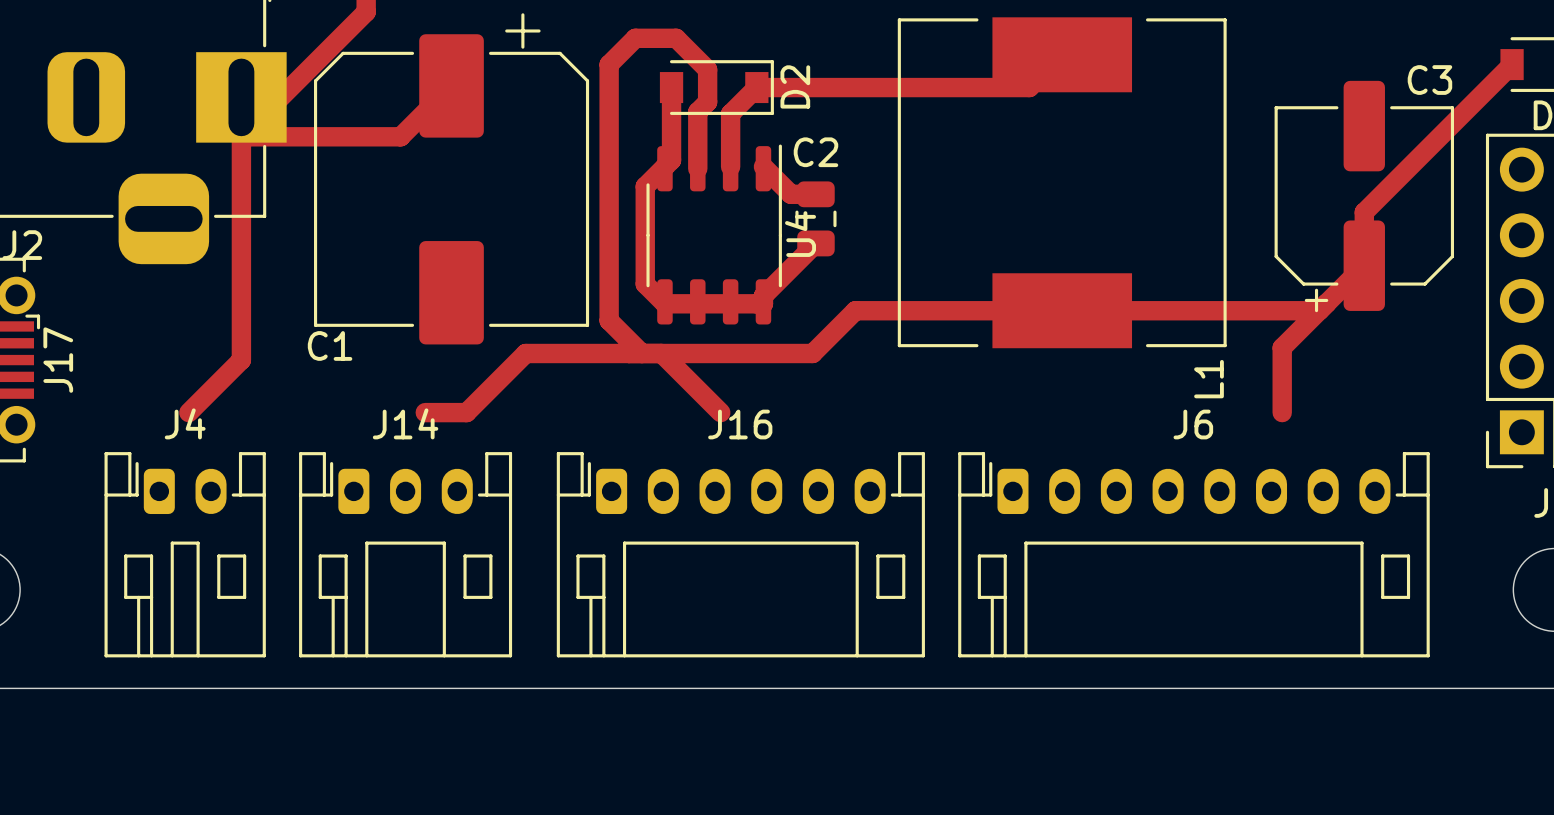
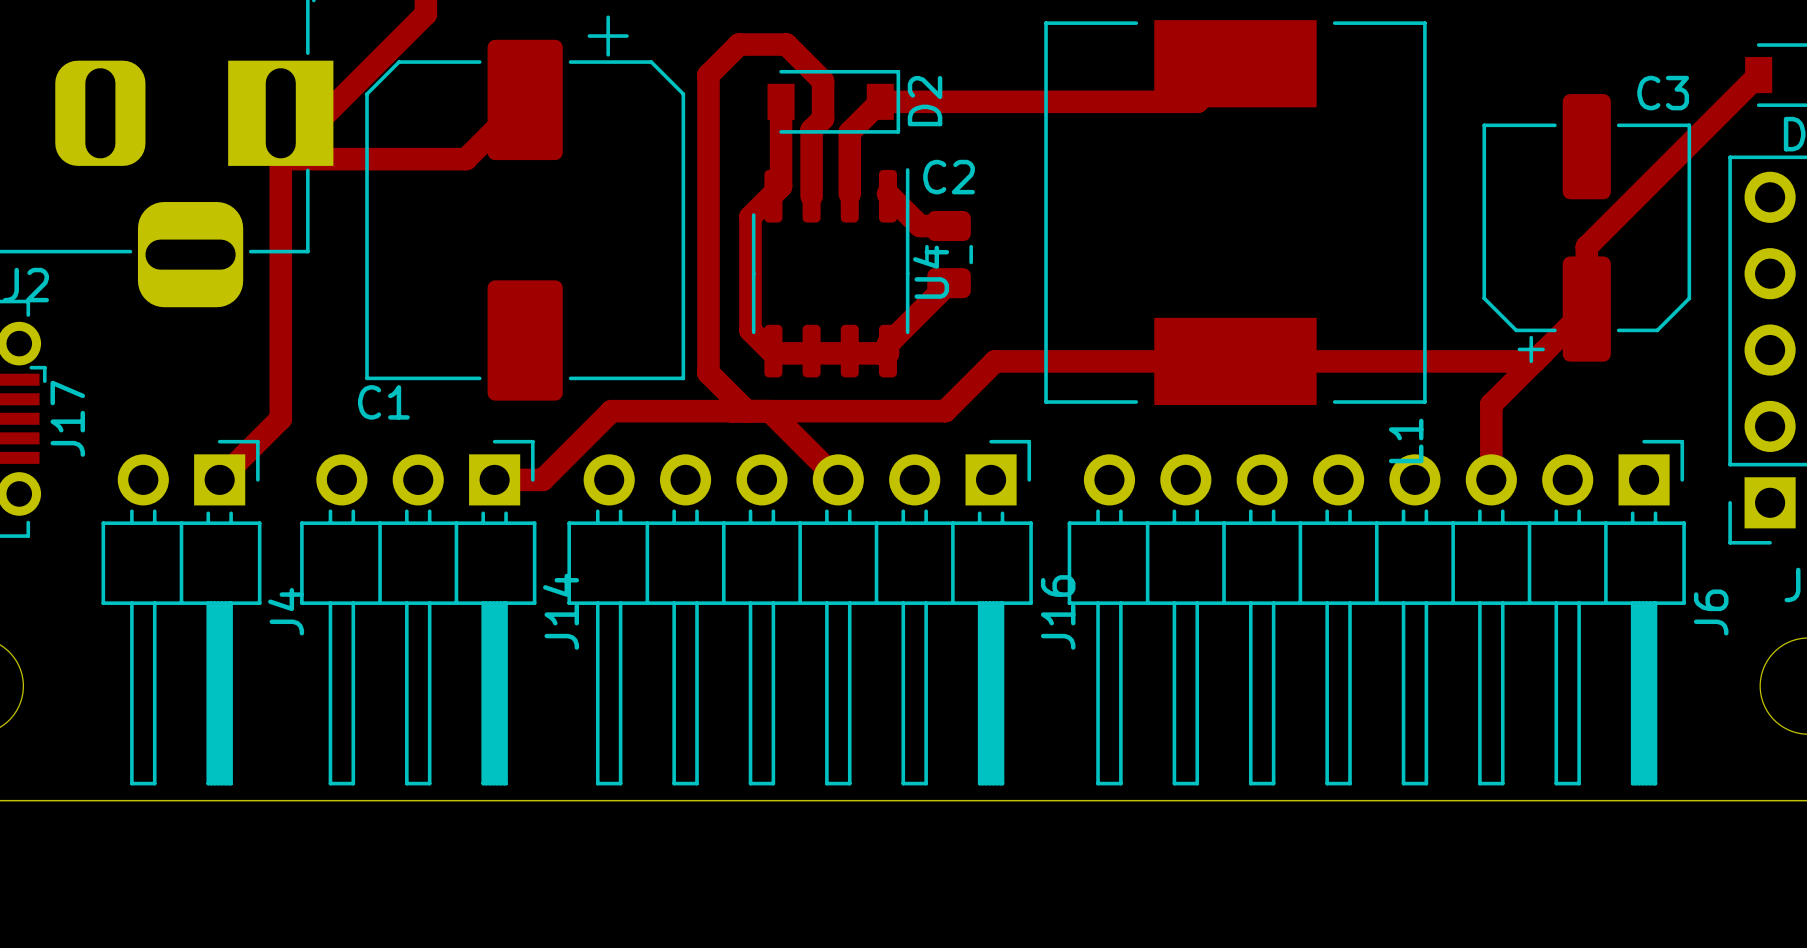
J4 name position: J4 (185, 423) -> J4 (286, 611)
J14 name position: J14 (405, 423) -> J14 (561, 611)
J16 name position: J16 (740, 424) -> J16 (1058, 612)
J6 name position: J6 (1193, 424) -> J6 (1711, 612)
J4 footprint: [104, 452, 266, 658] -> [101, 439, 262, 786]
J14 footprint: [299, 452, 513, 658] -> [300, 439, 537, 786]
J16 footprint: [556, 452, 925, 658] -> [567, 439, 1033, 786]
J6 footprint: [958, 452, 1430, 658] -> [1067, 439, 1686, 786]

